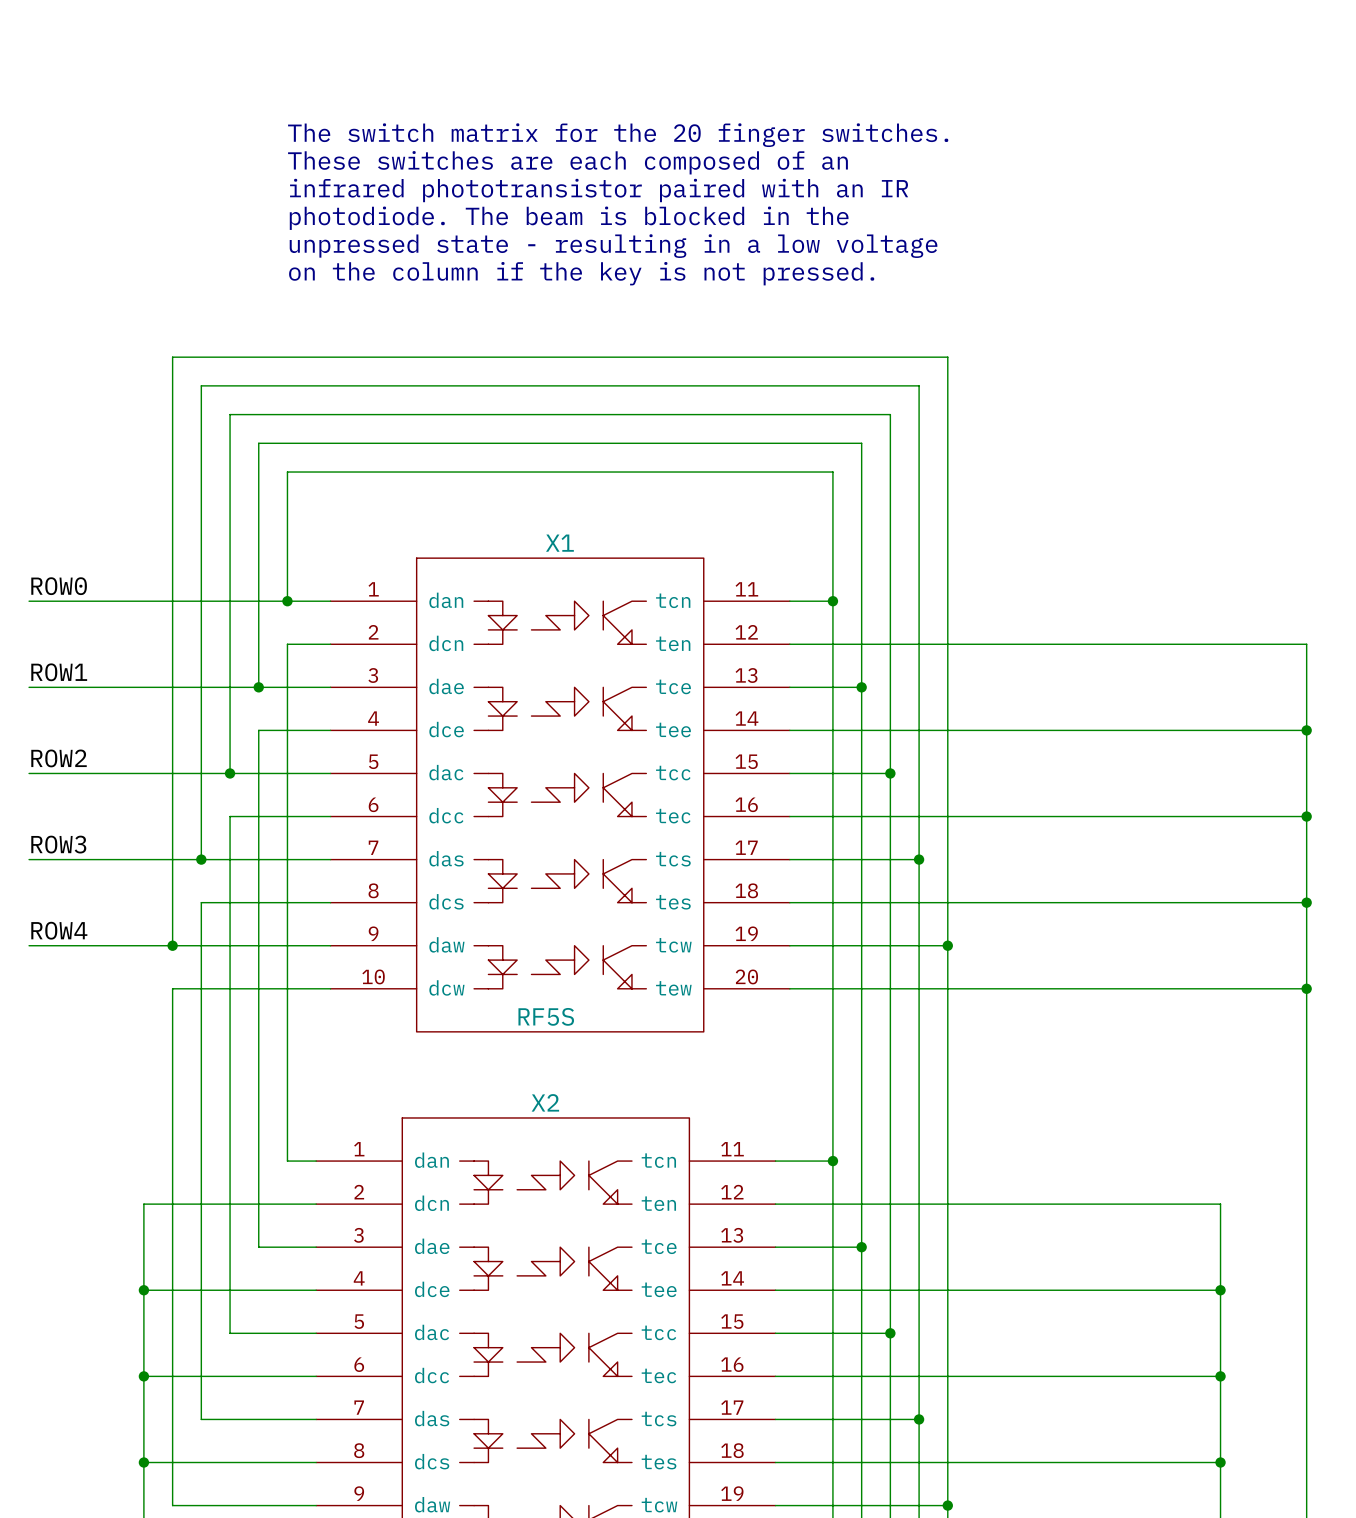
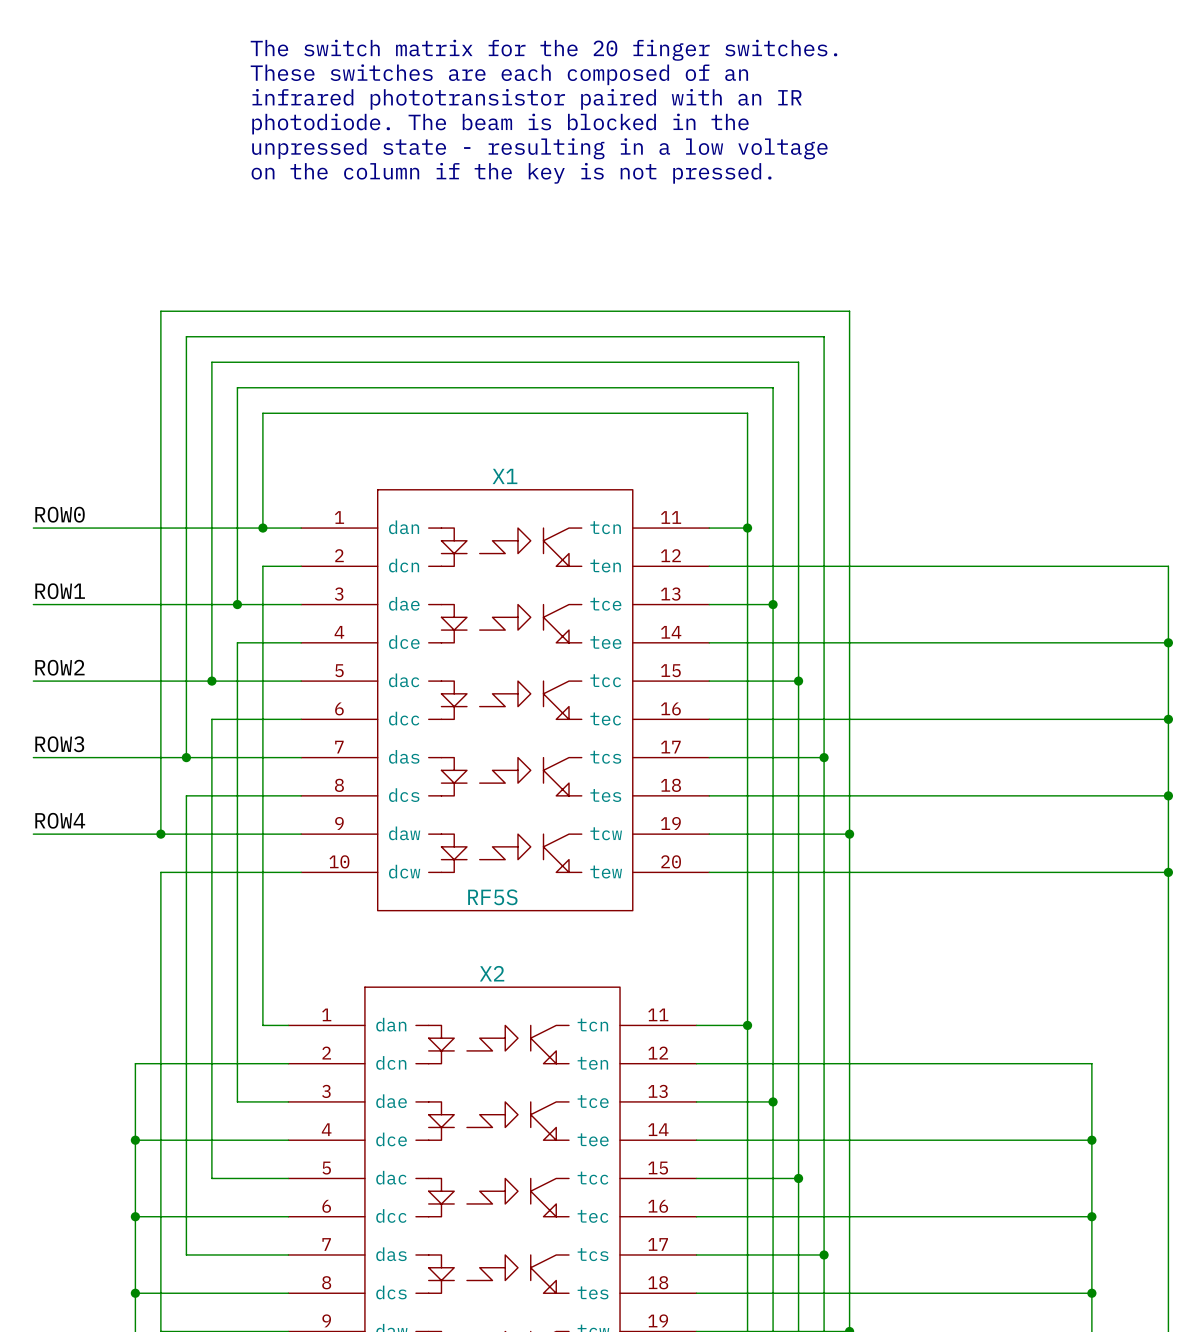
text position: The switch matrix for the 20 finger switches. (618, 135) -> The switch matrix for the 20 finger switches. (543, 50)
text position: These switches are each composed of an (567, 162) -> These switches are each composed of an (499, 74)
text position: infrared phototransistor paired with an IR (599, 190) -> infrared phototransistor paired with an IR (527, 99)
text position: photodiode. The beam is blocked in the (569, 218) -> photodiode. The beam is blocked in the (500, 124)
text position: unpressed state - resulting in a low voltage (613, 246) -> unpressed state - resulting in a low voltage (539, 148)
text position: on the column if the key is not pressed. (581, 273) -> on the column if the key is not pressed. (511, 173)

